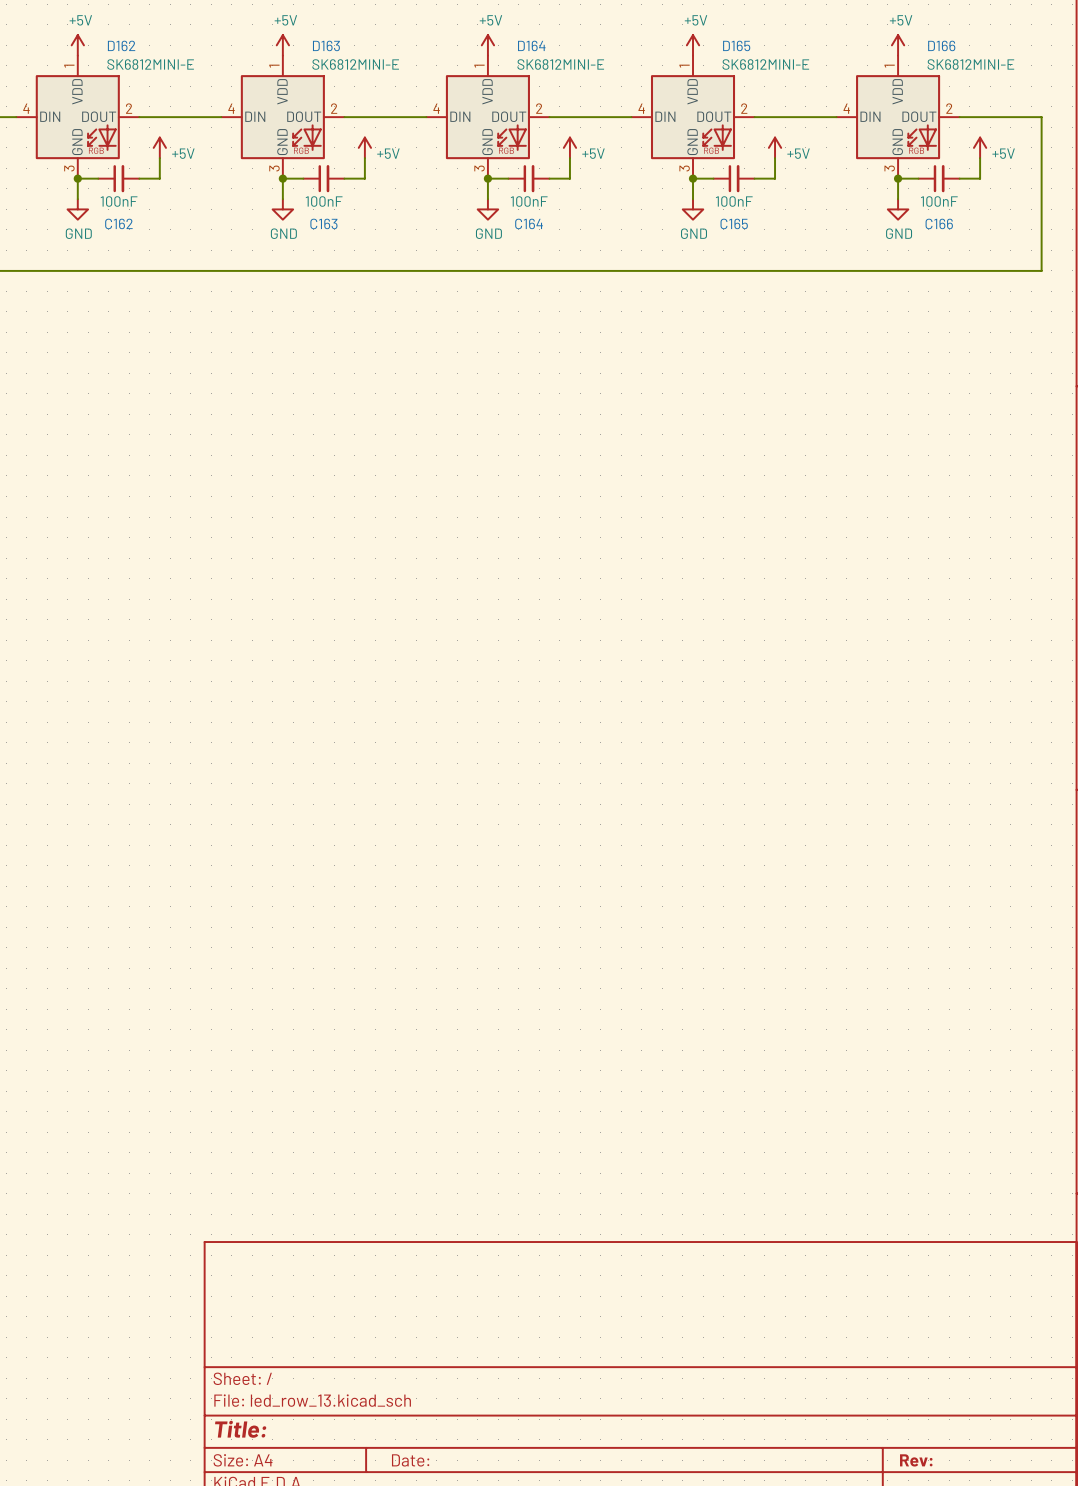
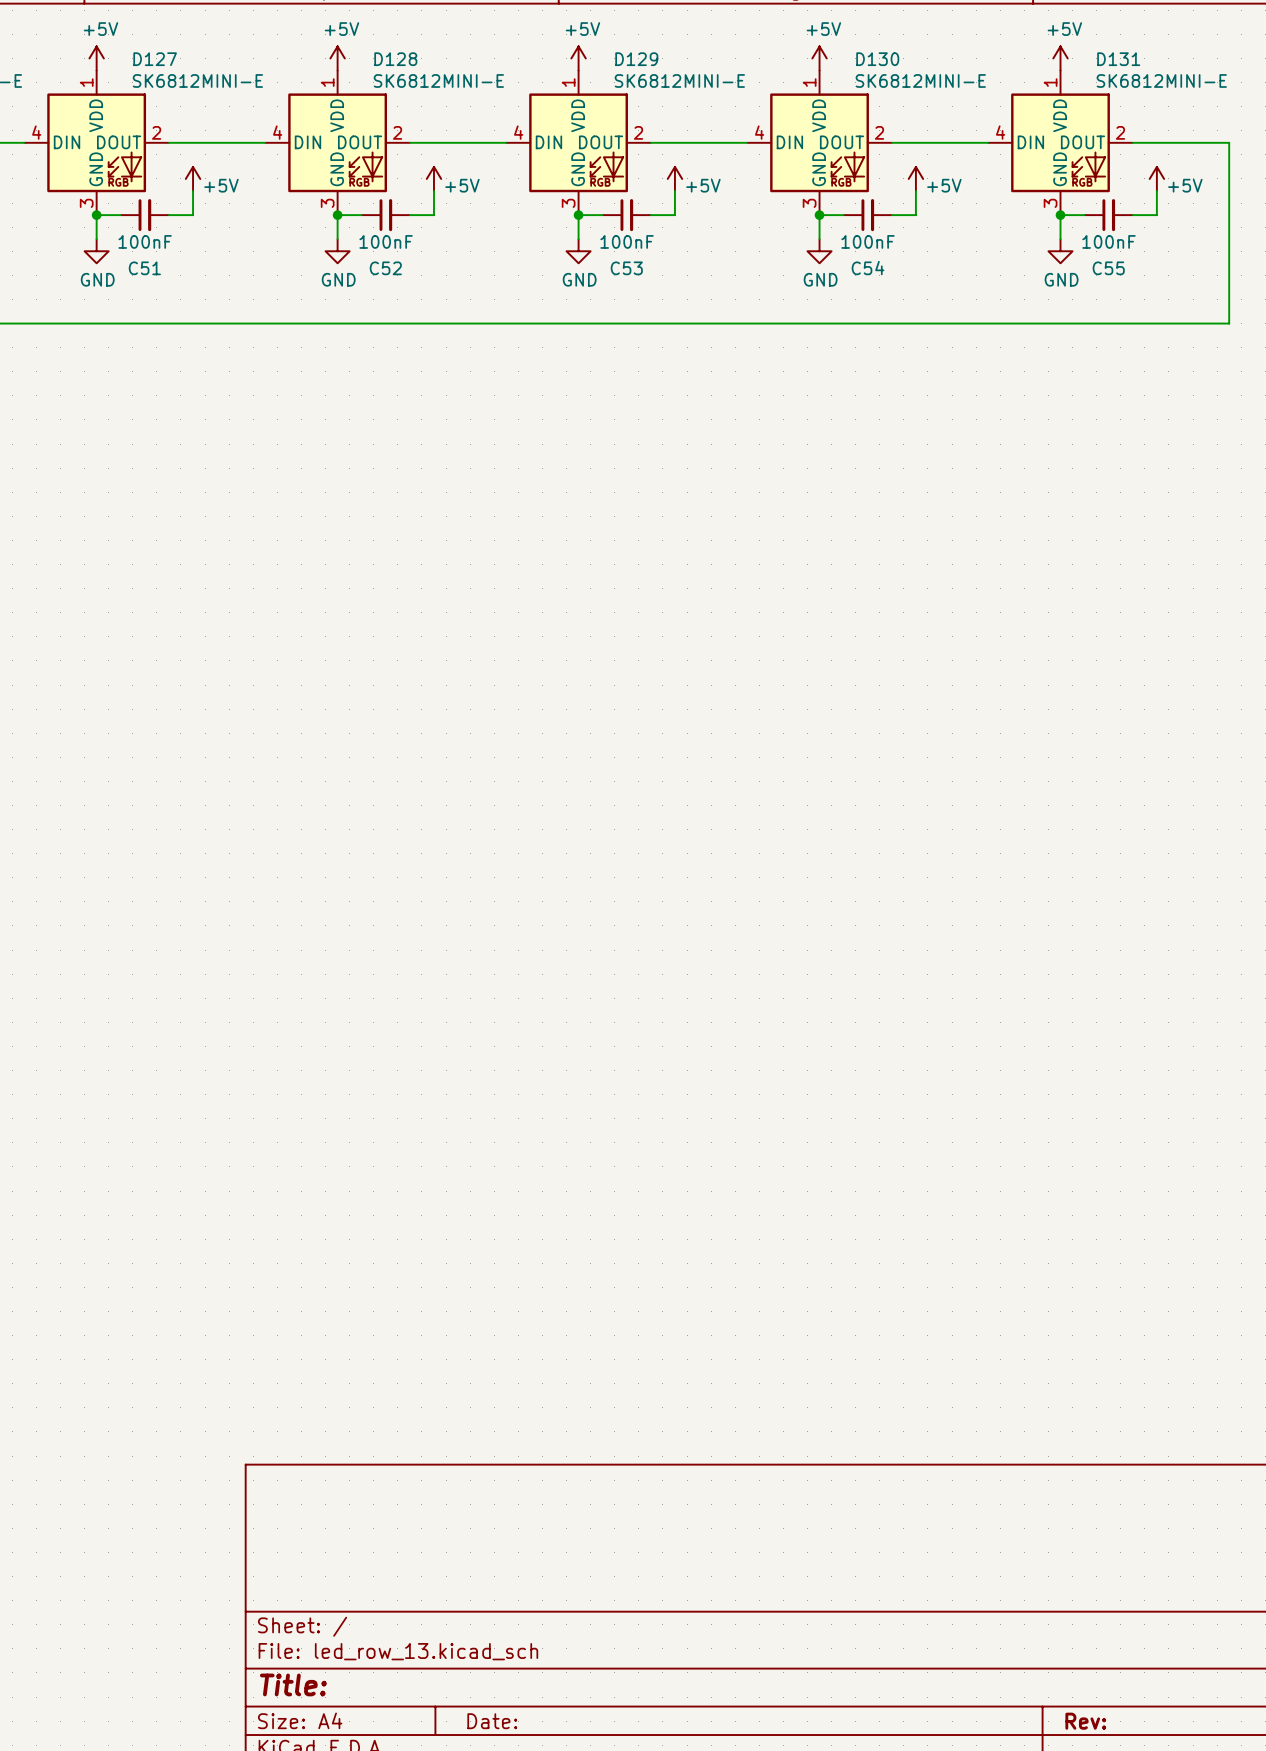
D162 name: D162 (121, 45) -> D127 (155, 59)
D163 name: D163 (326, 45) -> D128 (395, 59)
D164 name: D164 (531, 45) -> D129 (636, 59)
D165 name: D165 (736, 45) -> D130 (877, 59)
D166 name: D166 (941, 45) -> D131 (1118, 59)
C162 name: C162 (118, 223) -> C51 (144, 268)
C163 name: C163 (323, 223) -> C52 (385, 268)
C164 name: C164 (529, 223) -> C53 (626, 268)
C165 name: C165 (734, 223) -> C54 (868, 268)
C166 name: C166 (939, 223) -> C55 (1108, 268)

